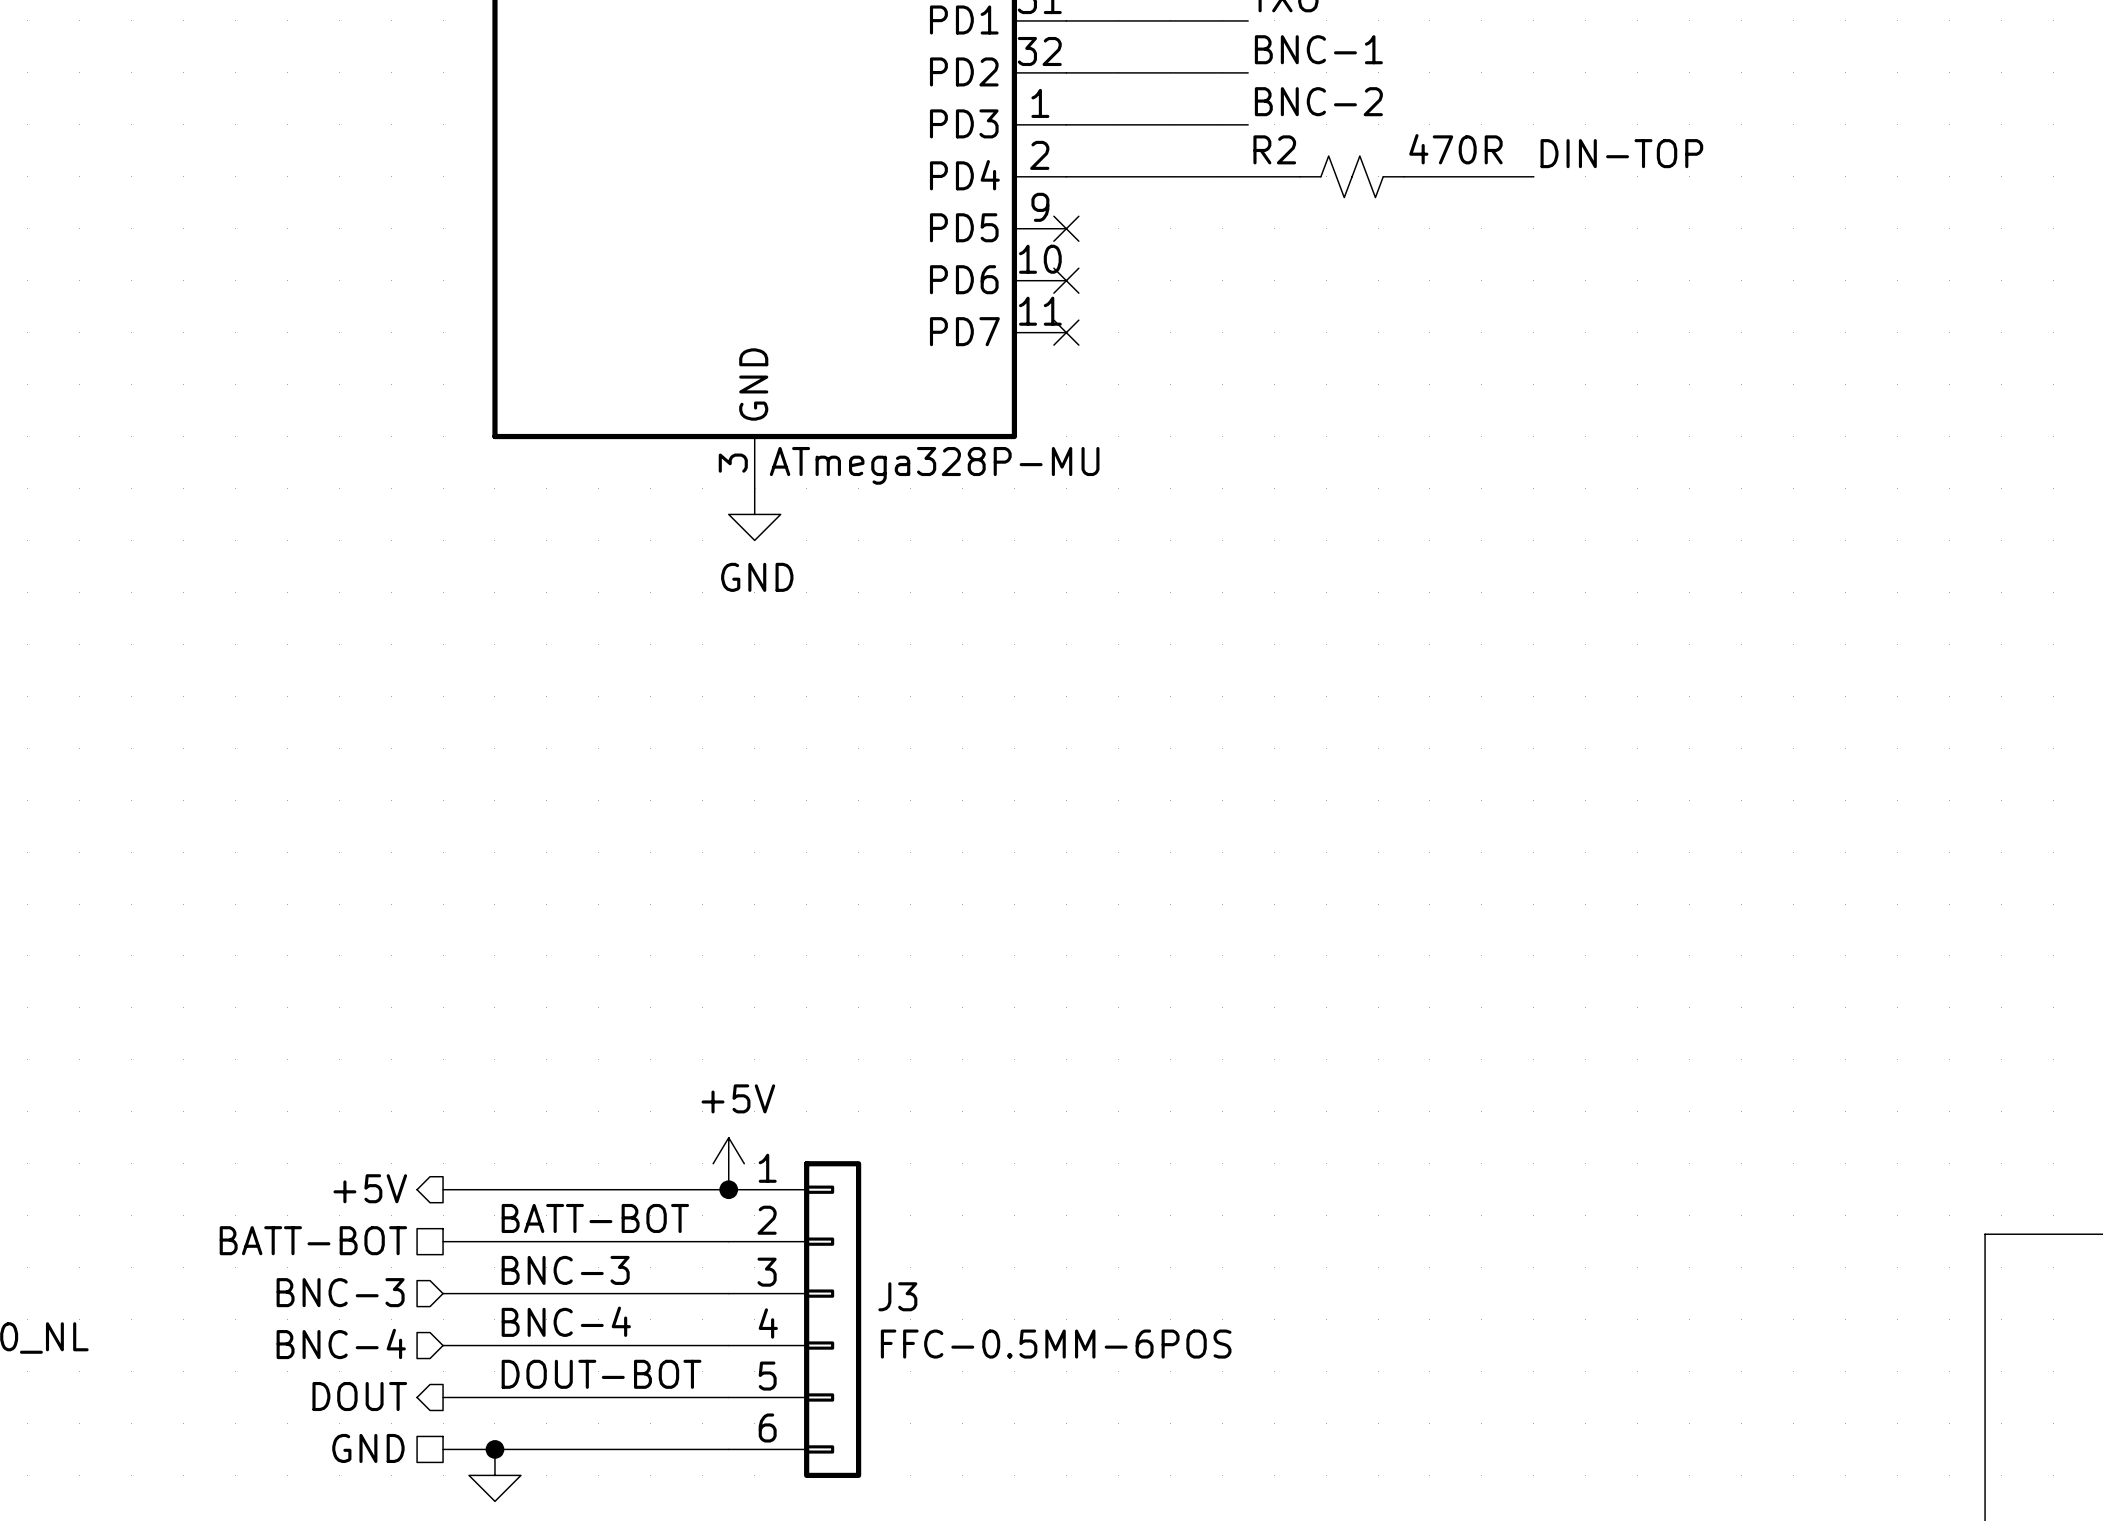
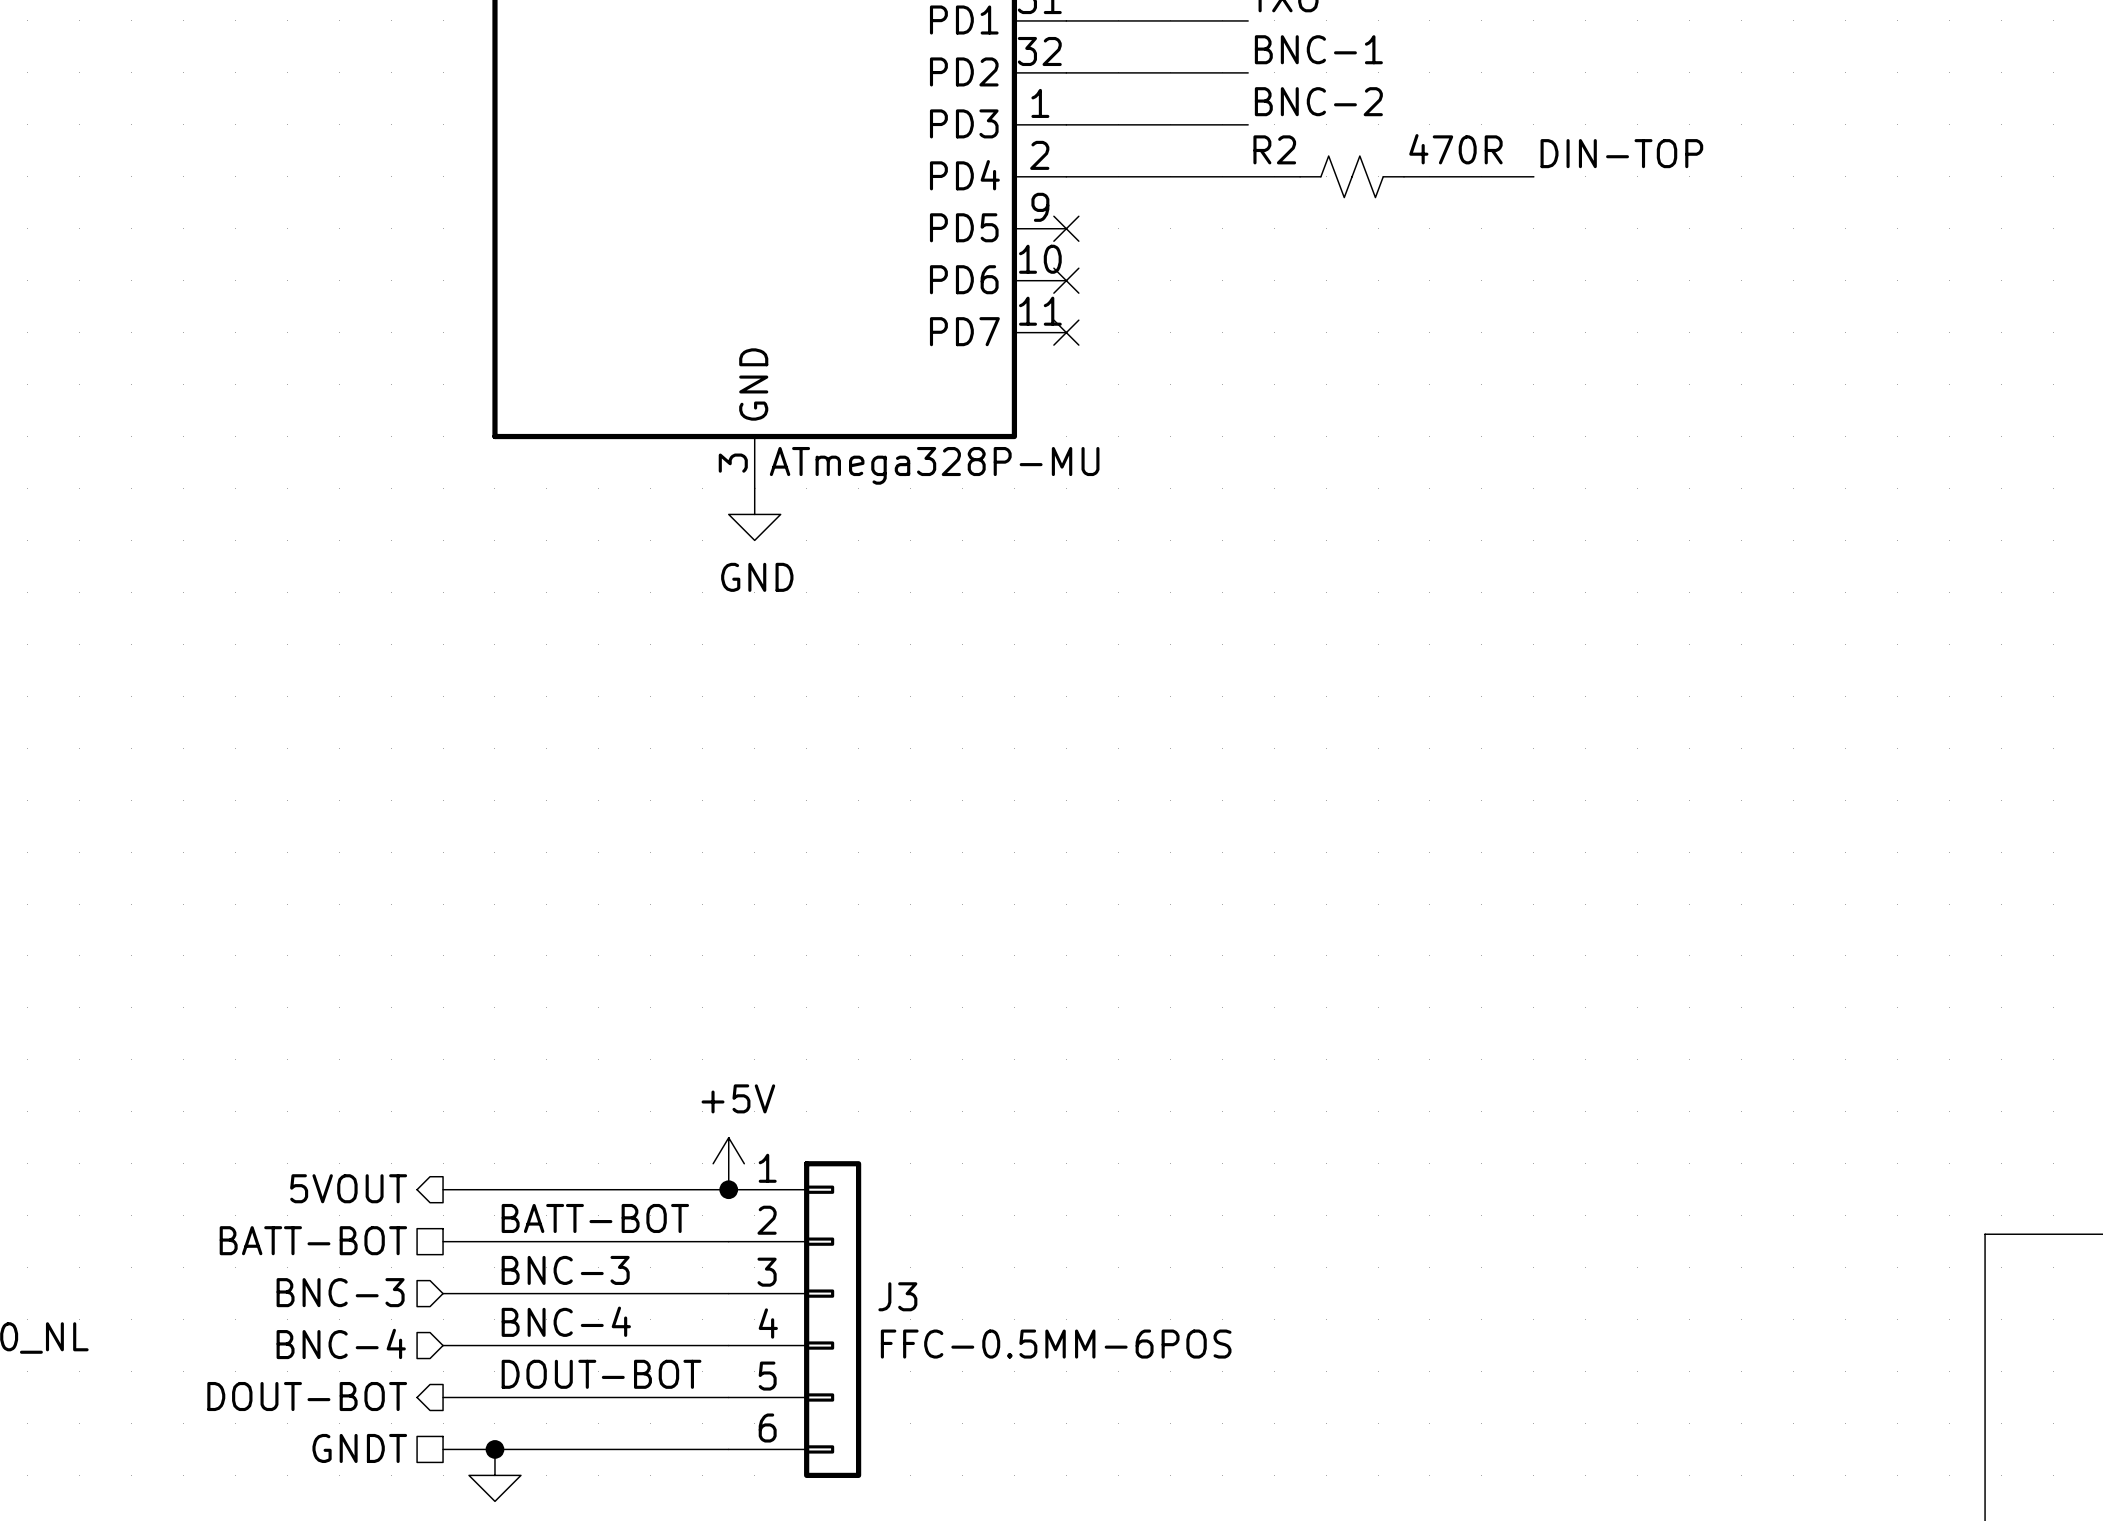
hierarchical label: +5V (370, 1188) -> 5VOUT (348, 1188)
hierarchical label: DOUT (359, 1396) -> DOUT-BOT (307, 1396)
hierarchical label: GND (368, 1448) -> GNDT (359, 1448)

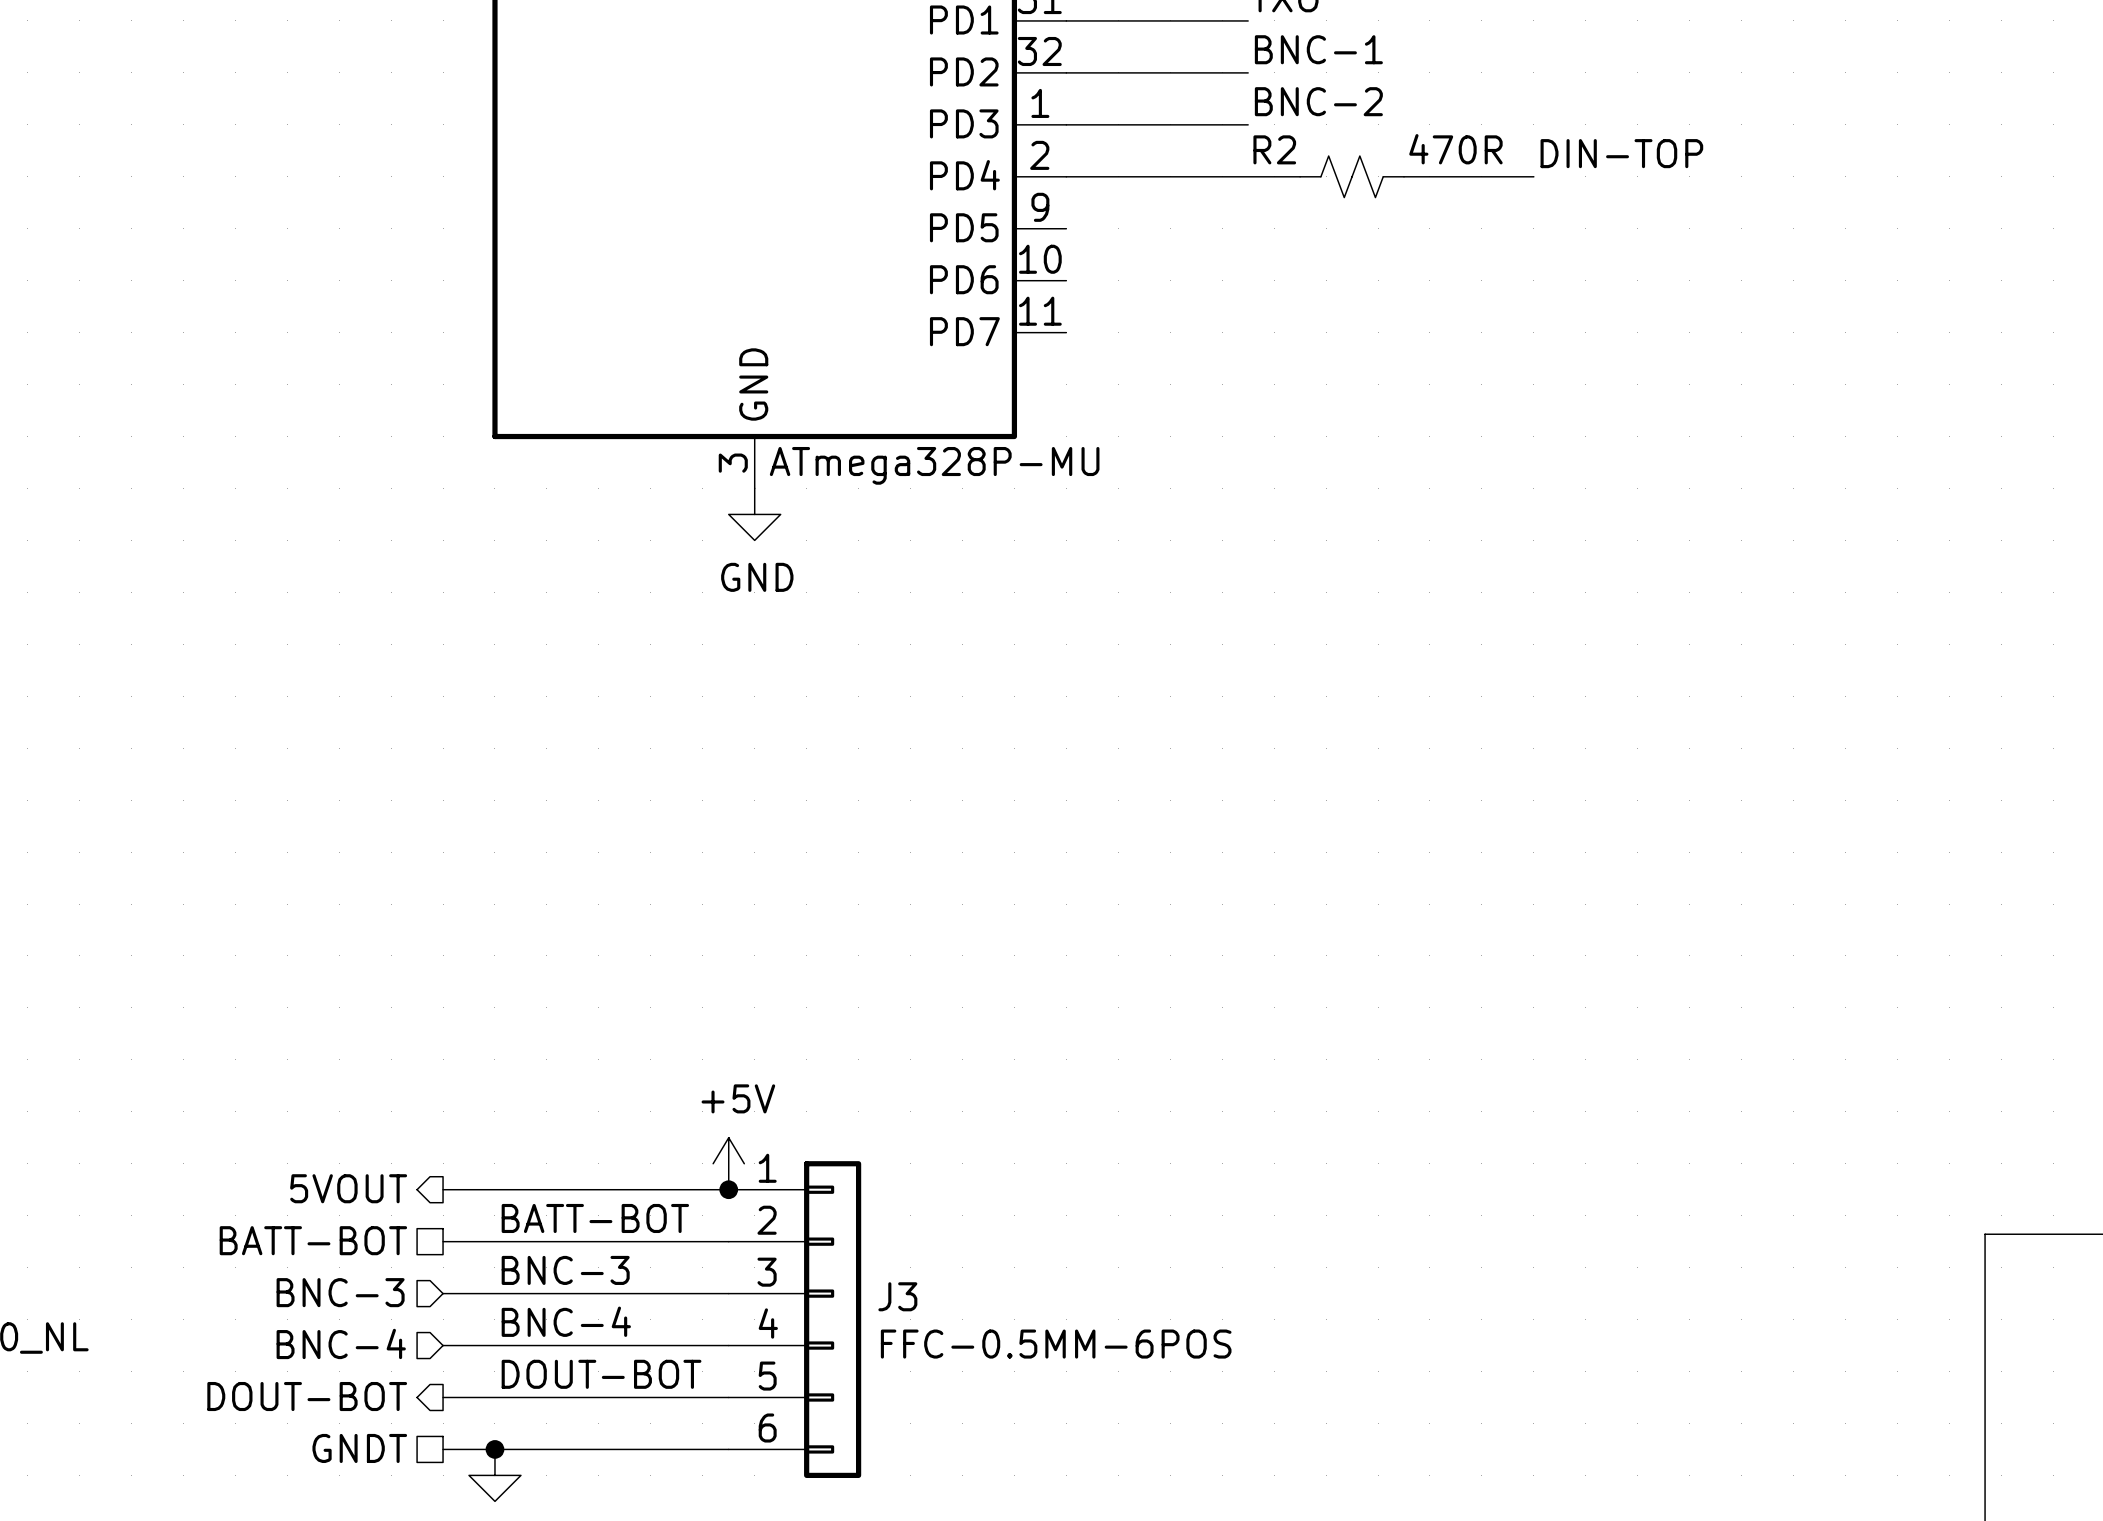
no-connect mark: (1066, 228) -> none
no-connect mark: (1066, 280) -> none
no-connect mark: (1066, 332) -> none

